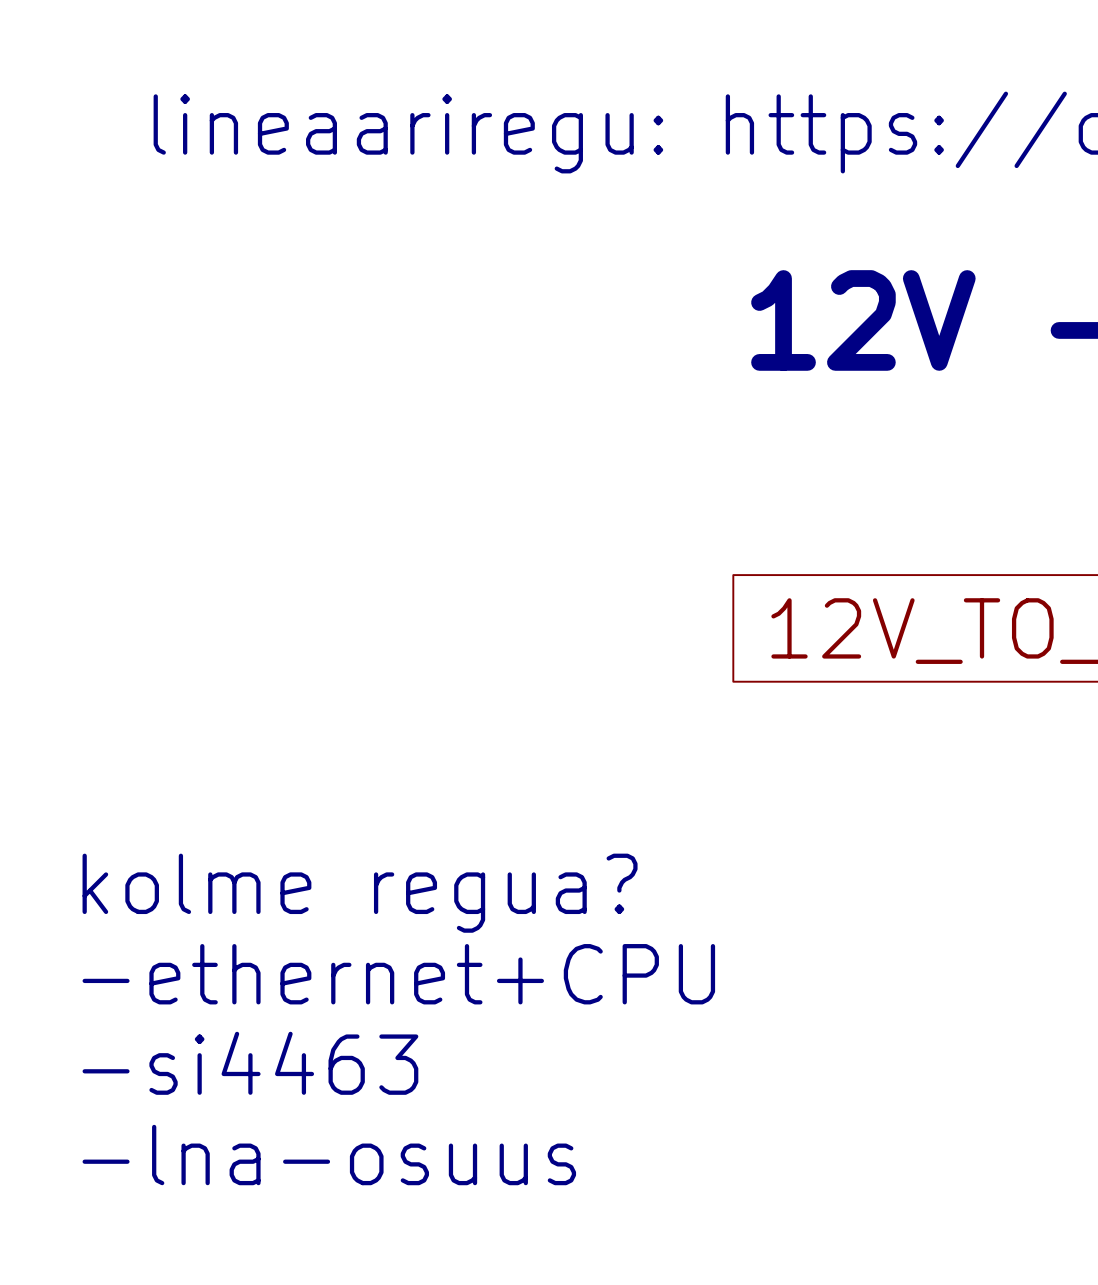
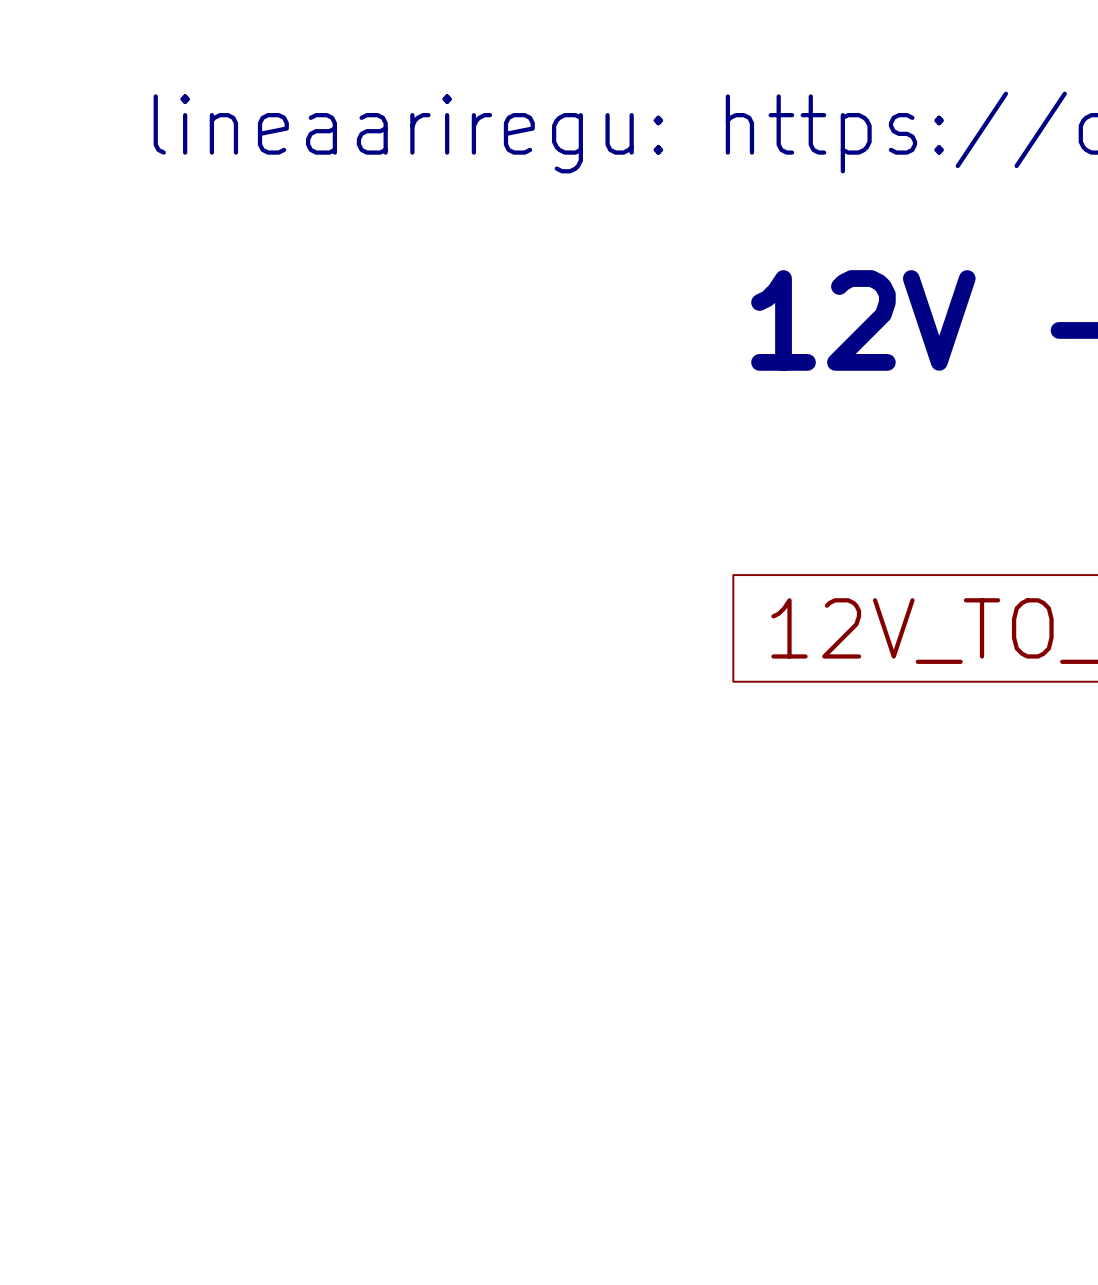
text: kolme regua? (360, 893) -> none
text: -ethernet+CPU (398, 974) -> none
text: -si4463 (250, 1063) -> none
text: -lna-osuus (329, 1155) -> none

